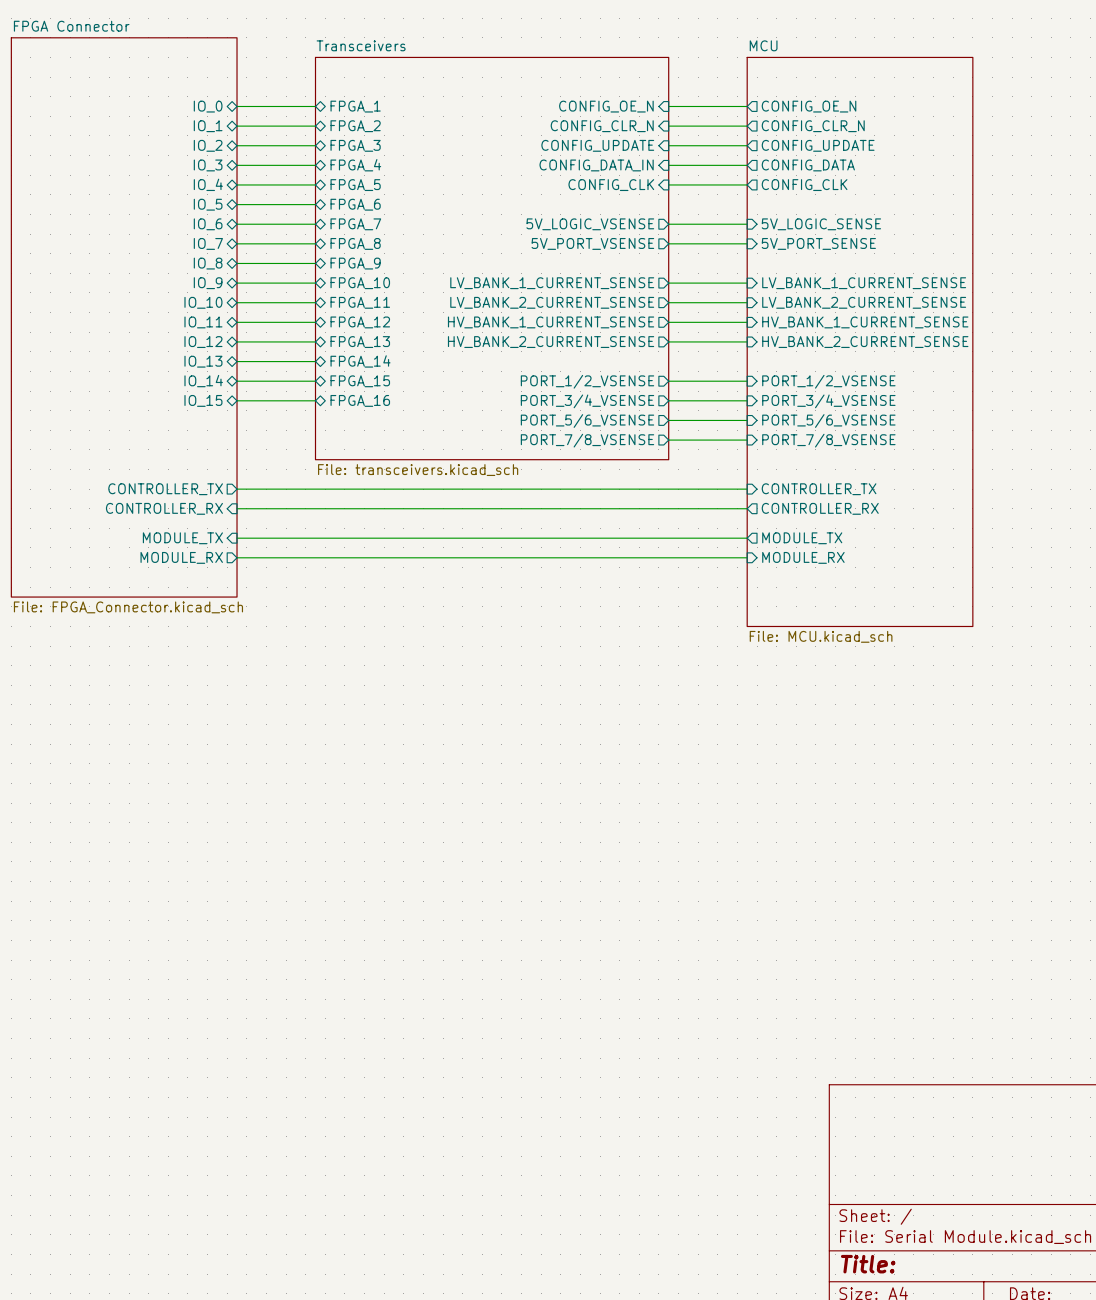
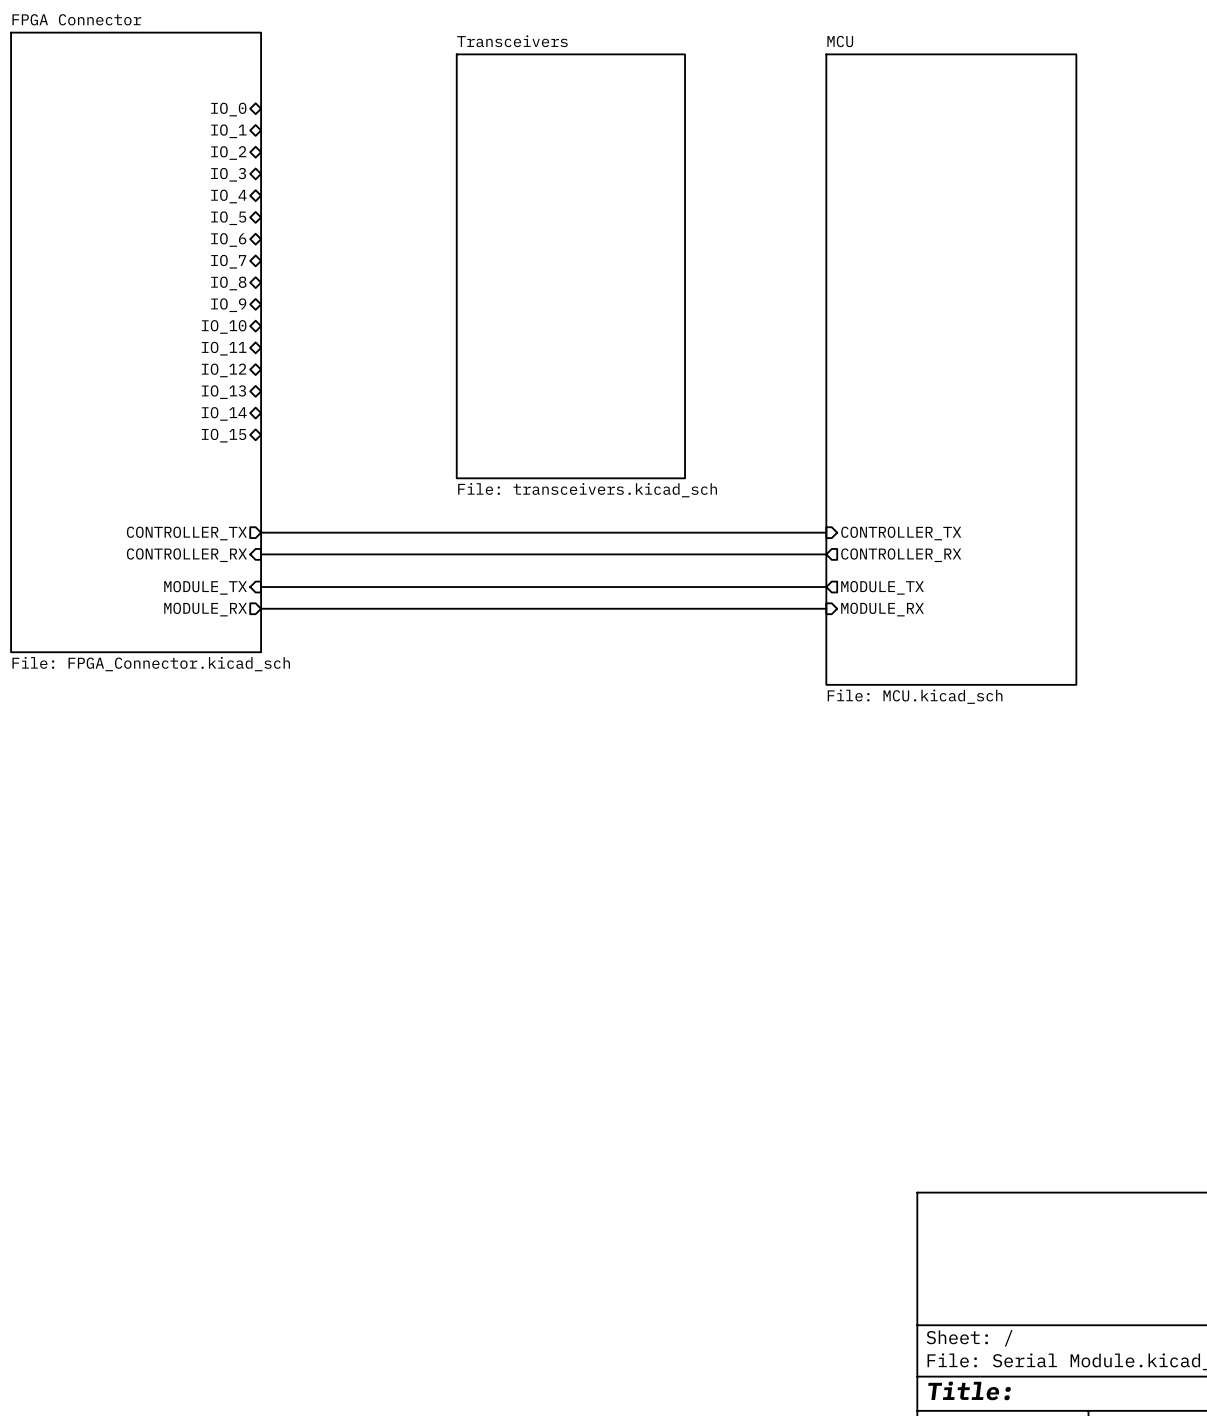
wire: (237, 106) (315, 106) -> none
sheet pin: FPGA_1 (355, 106) -> none
sheet pin: CONFIG_OE_N (606, 106) -> none
wire: (668, 106) (747, 106) -> none
sheet pin: CONFIG_OE_N (809, 106) -> none
wire: (237, 126) (315, 126) -> none
sheet pin: FPGA_2 (355, 126) -> none
sheet pin: CONFIG_CLR_N (602, 126) -> none
wire: (668, 126) (747, 126) -> none
sheet pin: CONFIG_CLR_N (813, 126) -> none
wire: (237, 145) (315, 145) -> none
sheet pin: FPGA_3 (355, 145) -> none
sheet pin: CONFIG_UPDATE (597, 145) -> none
wire: (668, 145) (747, 145) -> none
sheet pin: CONFIG_UPDATE (818, 145) -> none
wire: (237, 165) (315, 165) -> none
sheet pin: FPGA_4 (355, 165) -> none
sheet pin: CONFIG_DATA_IN (596, 165) -> none
wire: (668, 165) (747, 165) -> none
sheet pin: CONFIG_DATA (808, 165) -> none
wire: (237, 184) (315, 184) -> none
wire: (668, 184) (747, 184) -> none
sheet pin: FPGA_5 (355, 185) -> none
sheet pin: CONFIG_CLK (611, 185) -> none
sheet pin: CONFIG_CLK (804, 185) -> none
wire: (237, 204) (315, 204) -> none
sheet pin: FPGA_6 (355, 204) -> none
wire: (237, 224) (315, 224) -> none
sheet pin: FPGA_7 (355, 224) -> none
sheet pin: 5V_LOGIC_VSENSE (590, 224) -> none
wire: (668, 224) (747, 224) -> none
sheet pin: 5V_LOGIC_SENSE (821, 224) -> none
wire: (237, 243) (315, 243) -> none
sheet pin: FPGA_8 (355, 243) -> none
sheet pin: 5V_PORT_VSENSE (592, 243) -> none
wire: (668, 243) (747, 243) -> none
sheet pin: 5V_PORT_SENSE (818, 243) -> none
sheet Transceivers: none -> File: transceivers.kicad_sch (570, 266)
sheet Transceivers: File: transceivers.kicad_sch (492, 258) -> none
wire: (237, 263) (315, 263) -> none
sheet pin: FPGA_9 (355, 263) -> none
wire: (237, 283) (315, 283) -> none
sheet pin: FPGA_10 (360, 283) -> none
sheet pin: LV_BANK_1_CURRENT_SENSE (552, 283) -> none
wire: (668, 283) (747, 283) -> none
sheet pin: LV_BANK_1_CURRENT_SENSE (864, 283) -> none
wire: (237, 302) (315, 302) -> none
sheet pin: FPGA_11 (360, 302) -> none
sheet pin: LV_BANK_2_CURRENT_SENSE (552, 302) -> none
wire: (668, 302) (747, 302) -> none
sheet pin: LV_BANK_2_CURRENT_SENSE (864, 302) -> none
wire: (237, 322) (315, 322) -> none
sheet pin: FPGA_12 (360, 322) -> none
sheet pin: HV_BANK_1_CURRENT_SENSE (551, 322) -> none
wire: (668, 322) (747, 322) -> none
sheet pin: HV_BANK_1_CURRENT_SENSE (865, 322) -> none
wire: (237, 341) (315, 341) -> none
wire: (668, 341) (747, 341) -> none
sheet pin: FPGA_13 (360, 342) -> none
sheet pin: HV_BANK_2_CURRENT_SENSE (551, 342) -> none
sheet pin: HV_BANK_2_CURRENT_SENSE (865, 342) -> none
wire: (237, 361) (315, 361) -> none
sheet pin: FPGA_14 (360, 361) -> none
wire: (237, 381) (315, 381) -> none
sheet pin: FPGA_15 (360, 381) -> none
sheet pin: PORT_1/2_VSENSE (587, 381) -> none
wire: (668, 381) (747, 381) -> none
sheet pin: PORT_1/2_VSENSE (828, 381) -> none
wire: (237, 400) (315, 400) -> none
sheet pin: FPGA_16 (360, 400) -> none
wire: (668, 400) (747, 400) -> none
sheet pin: PORT_3/4_VSENSE (587, 401) -> none
sheet pin: PORT_3/4_VSENSE (828, 401) -> none
wire: (668, 420) (747, 420) -> none
sheet pin: PORT_5/6_VSENSE (587, 421) -> none
sheet pin: PORT_5/6_VSENSE (828, 421) -> none
sheet pin: PORT_7/8_VSENSE (587, 440) -> none
wire: (668, 440) (747, 440) -> none
sheet pin: PORT_7/8_VSENSE (828, 440) -> none

